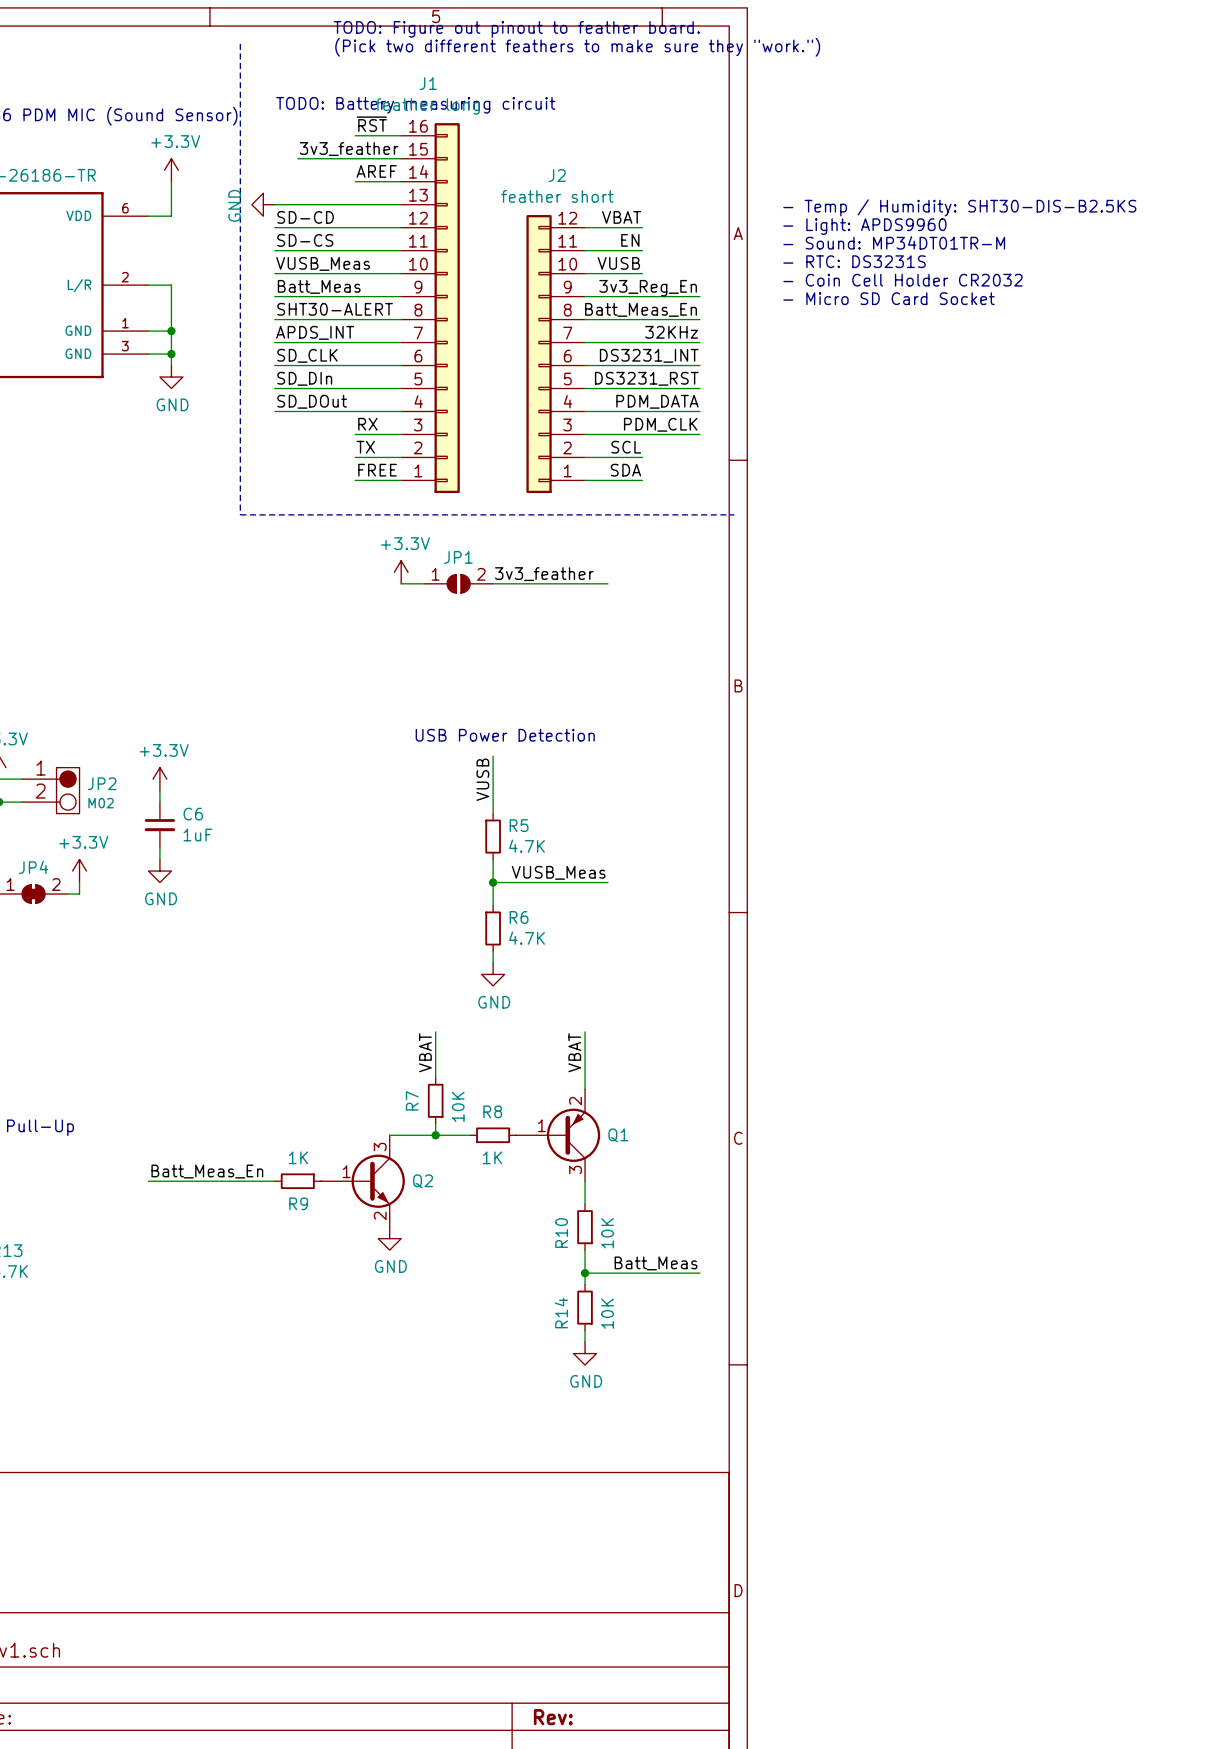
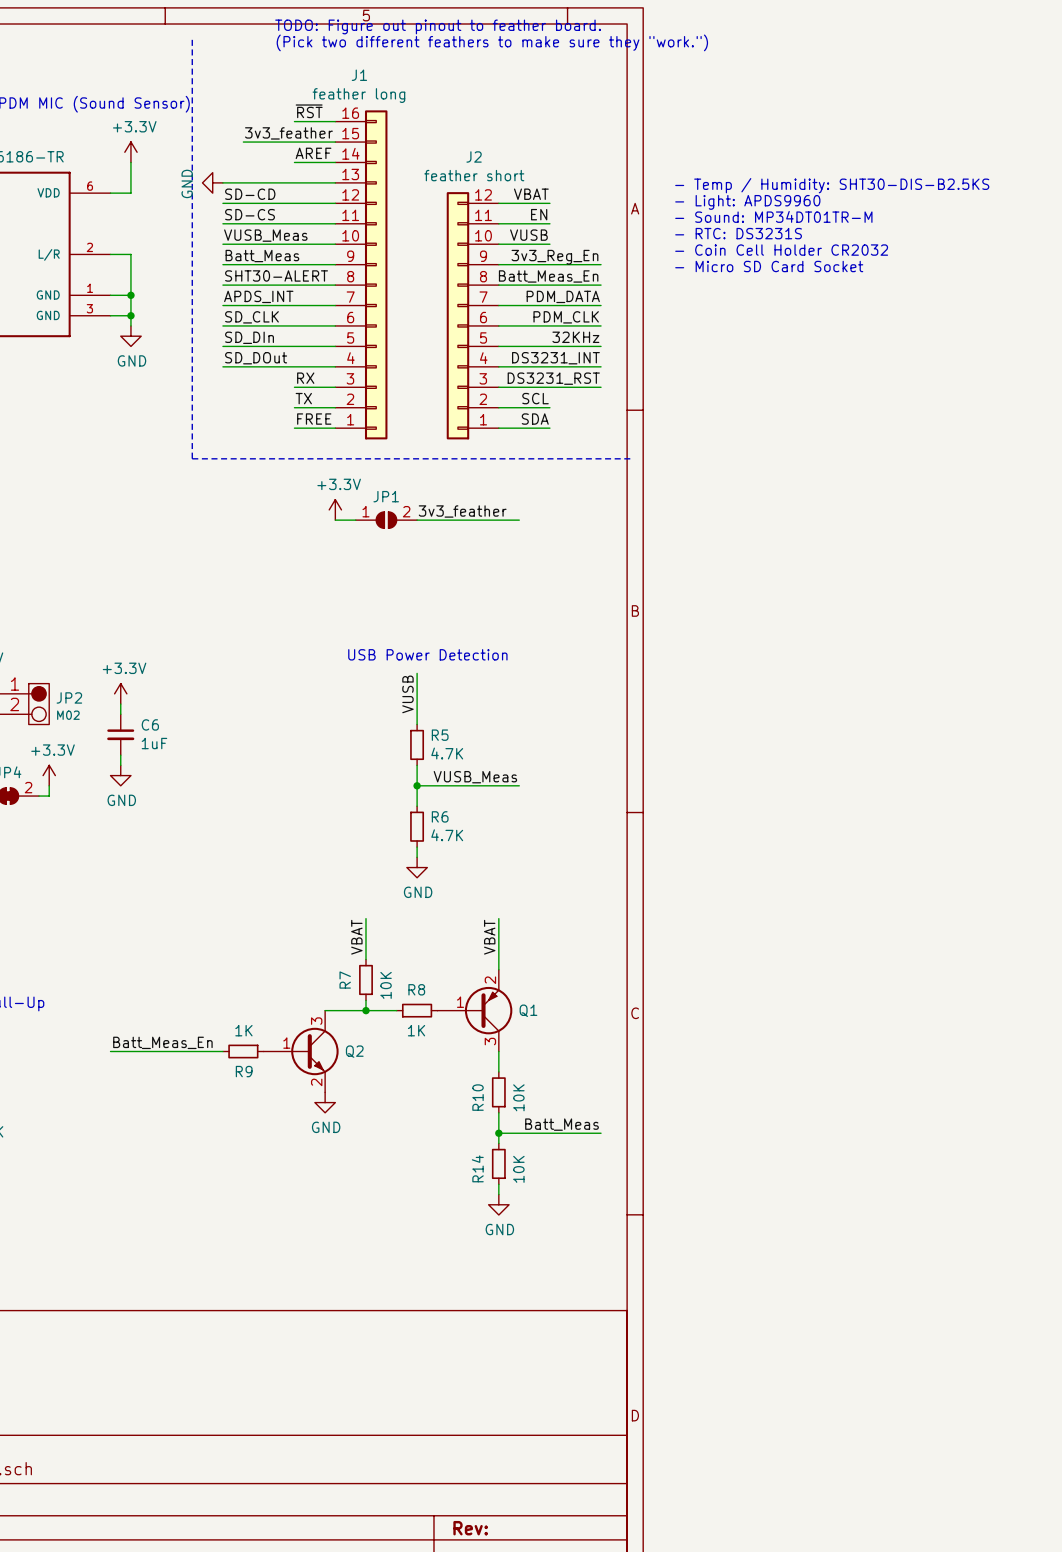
text: TODO: Battery measuring circuit (415, 105) -> none
label: 32KHz (671, 332) -> PDM_DATA (563, 296)
label: DS3231_INT (649, 355) -> PDM_CLK (566, 317)
label: DS3231_RST (646, 378) -> 32KHz (575, 337)
label: PDM_DATA (657, 401) -> DS3231_INT (555, 358)
label: PDM_CLK (660, 424) -> DS3231_RST (553, 378)

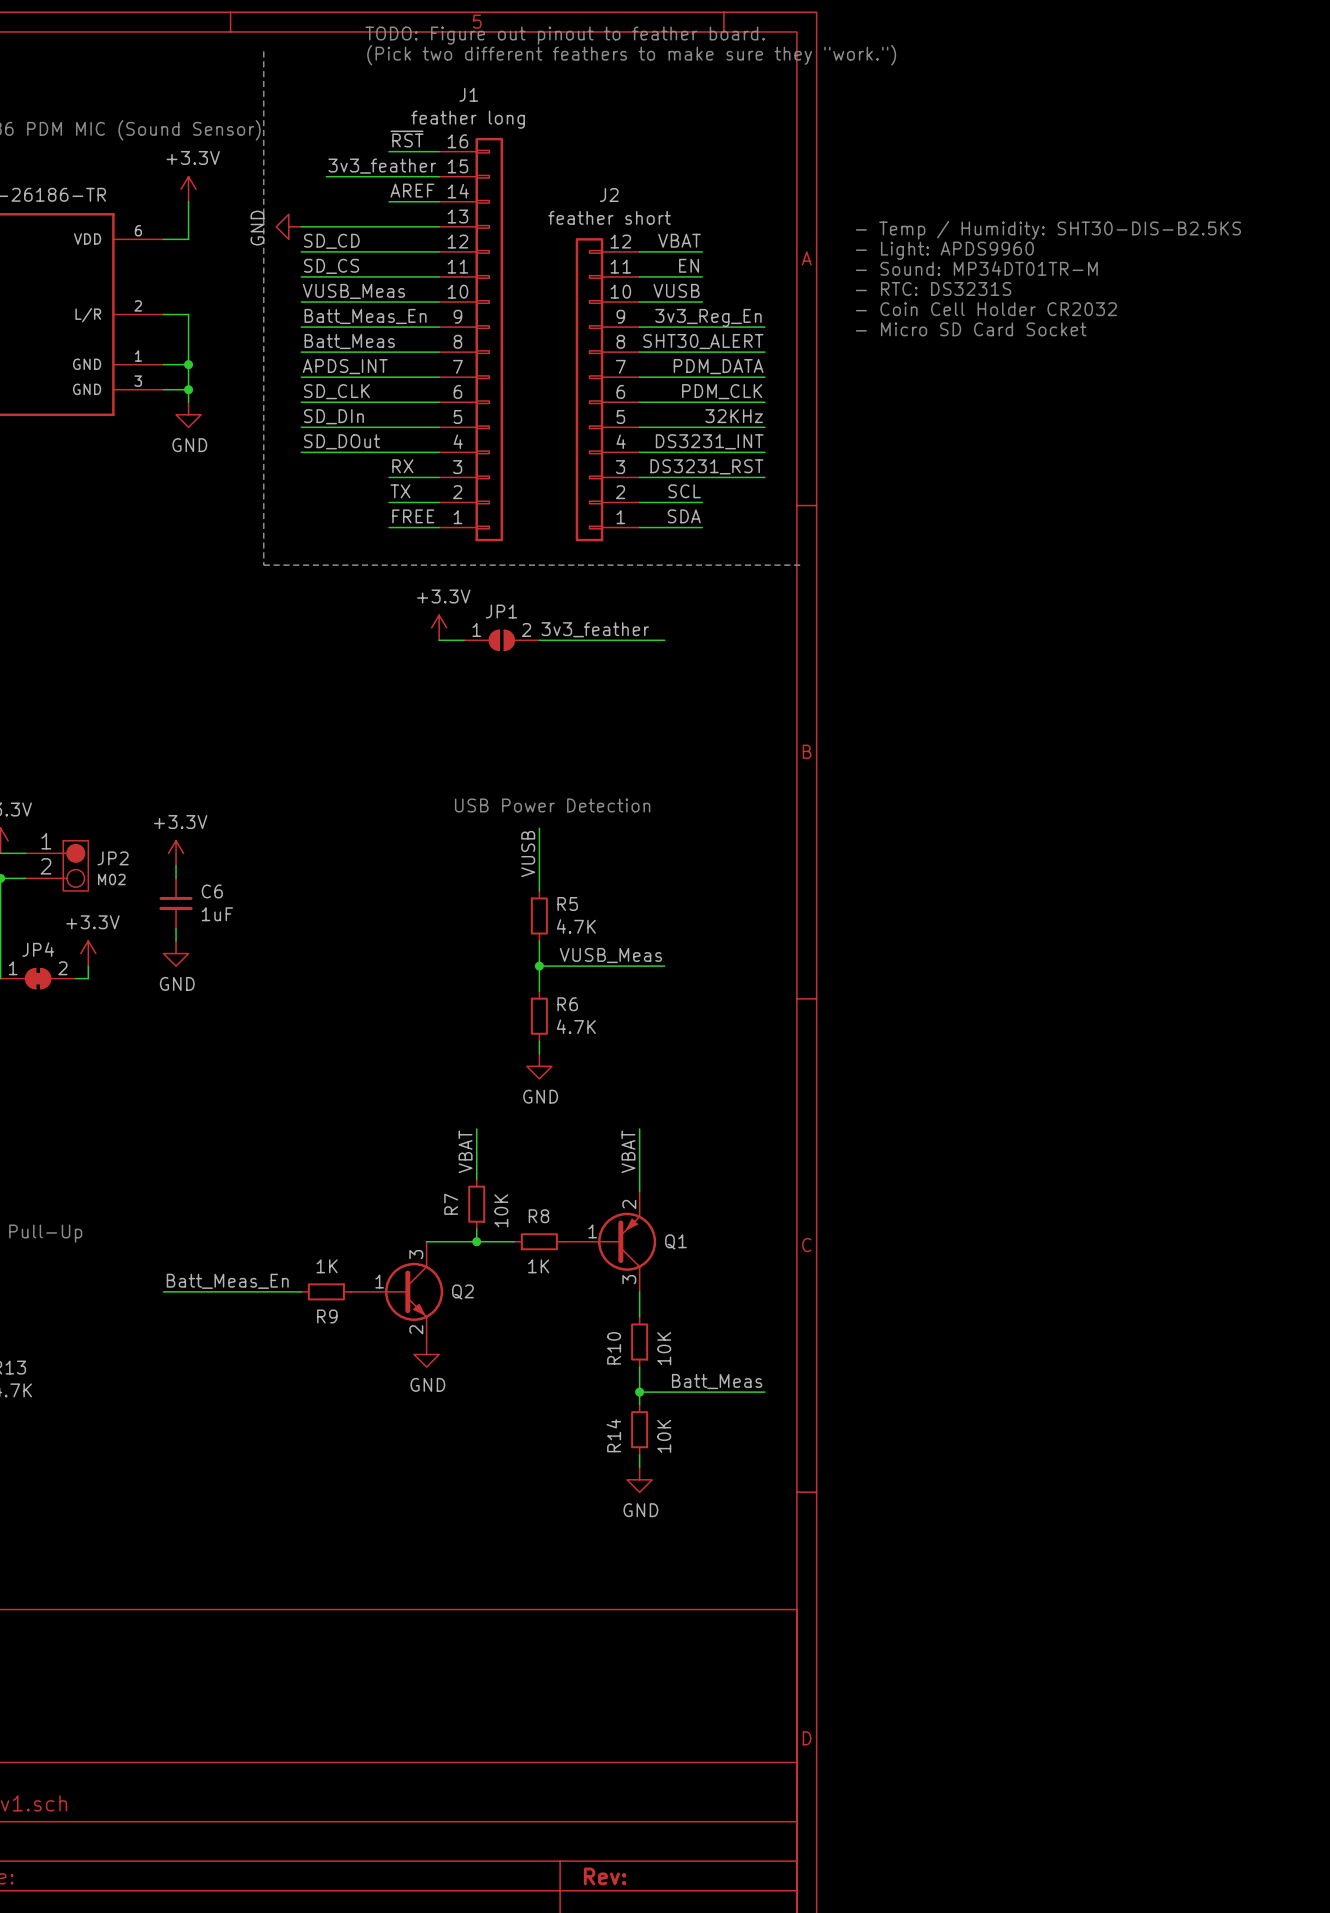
label: SD-CD (250, 194) -> SD_CD (331, 241)
label: SD-CS (250, 214) -> SD_CS (331, 266)
label: Batt_Meas (262, 256) -> Batt_Meas_En (365, 316)
label: SHT30-ALERT (276, 275) -> Batt_Meas (349, 341)
label: Batt_Meas_En (548, 276) -> SHT30_ALERT (703, 341)

